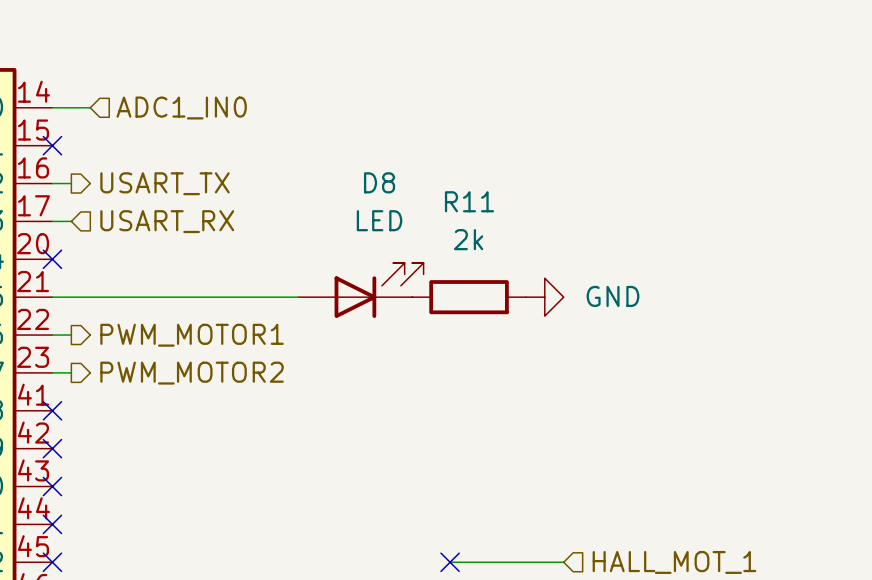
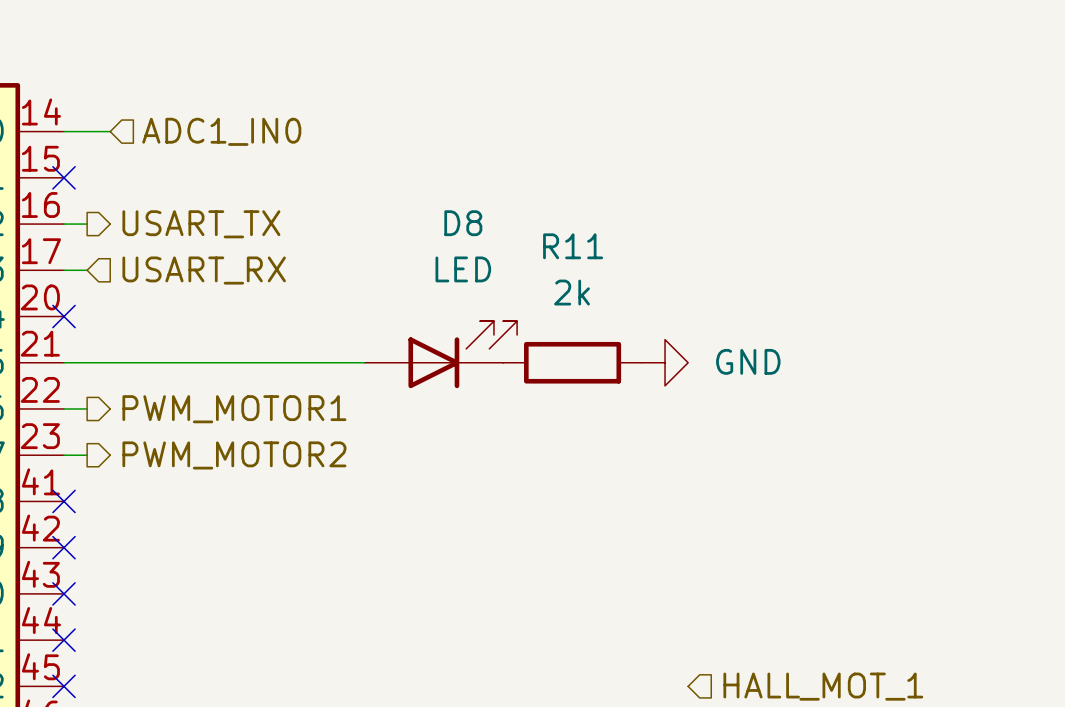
wire: (450, 562) (563, 562) -> none
no-connect mark: (450, 562) -> none

